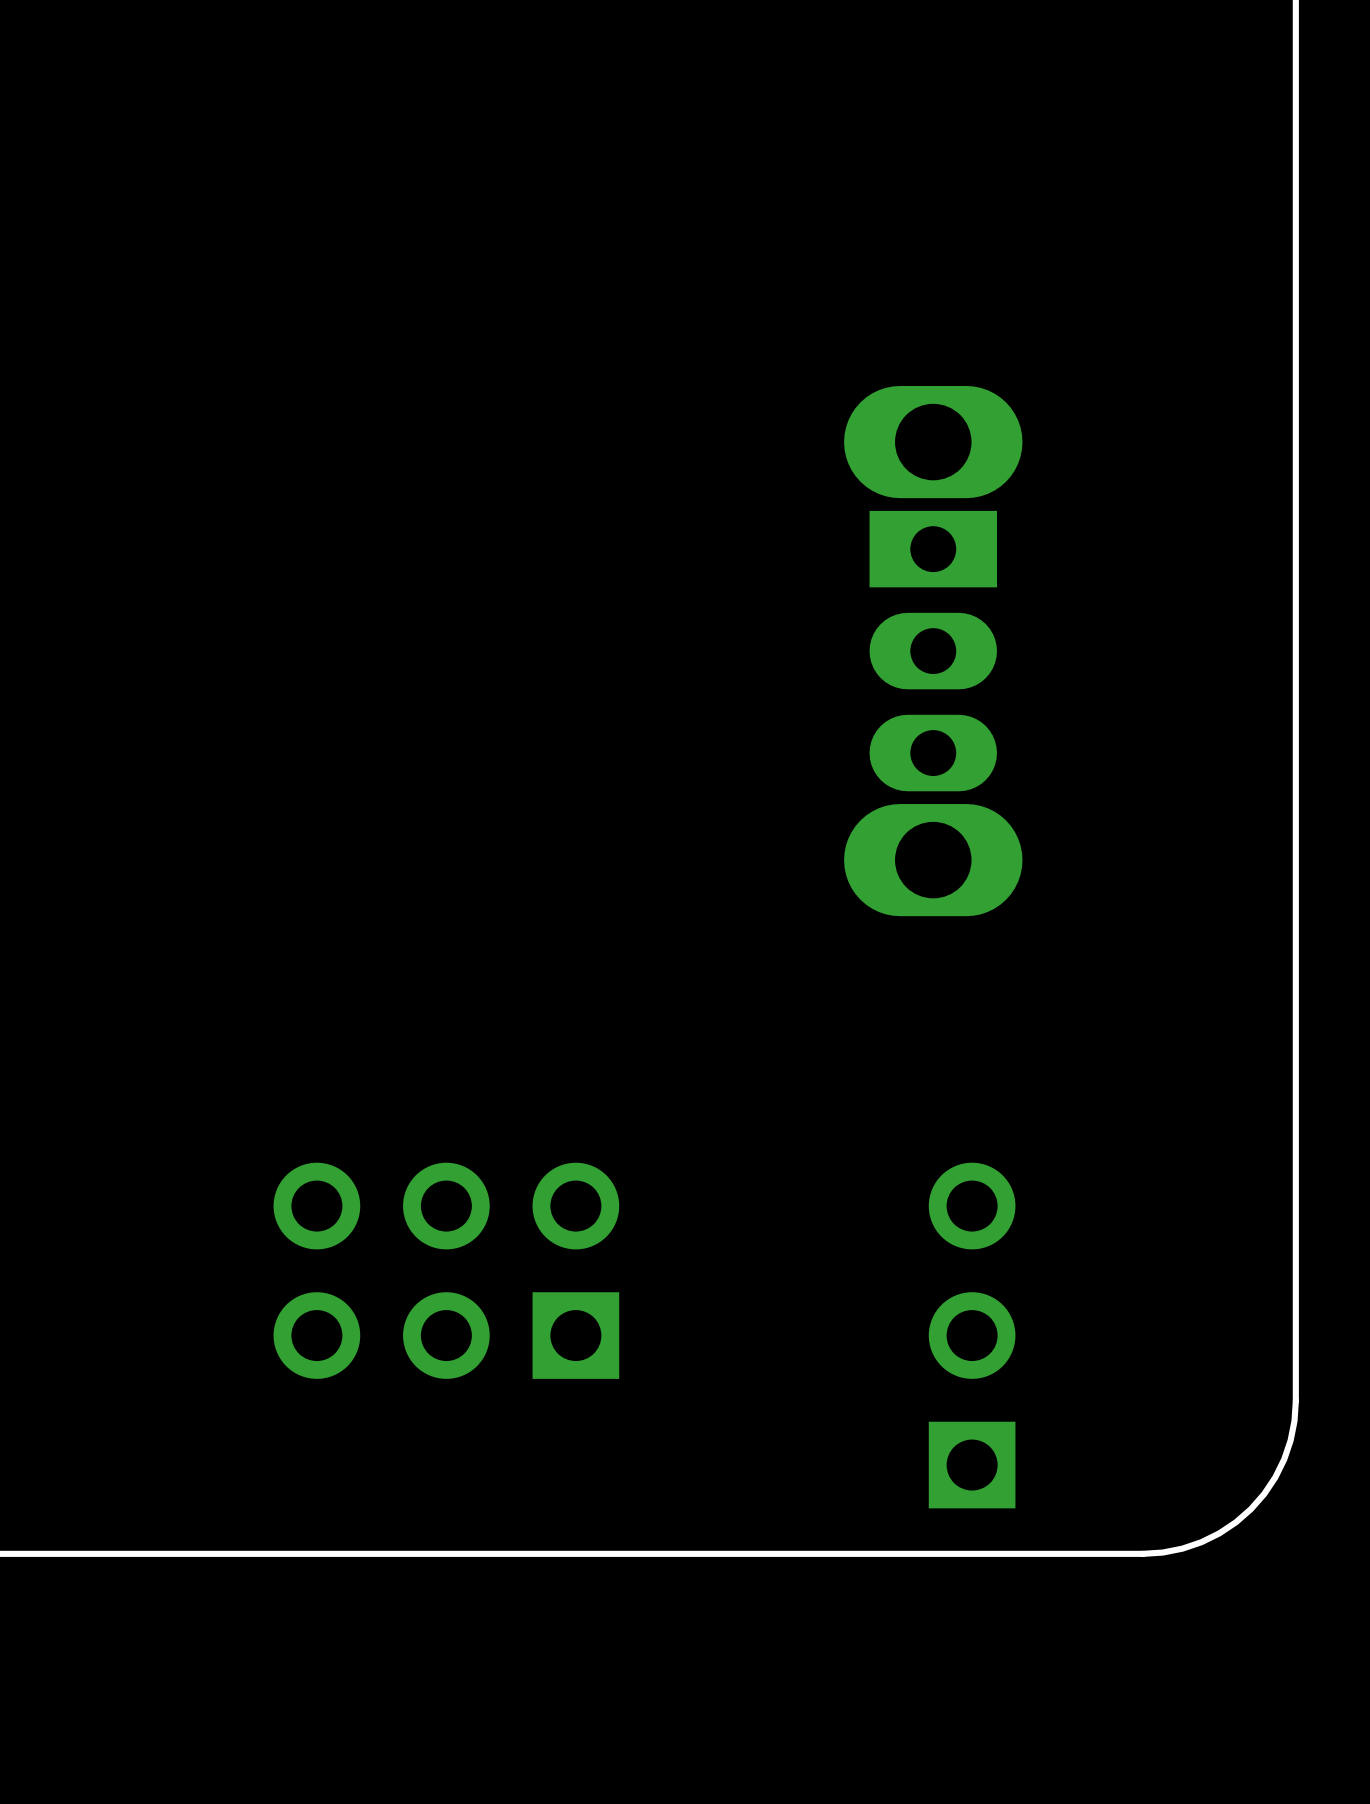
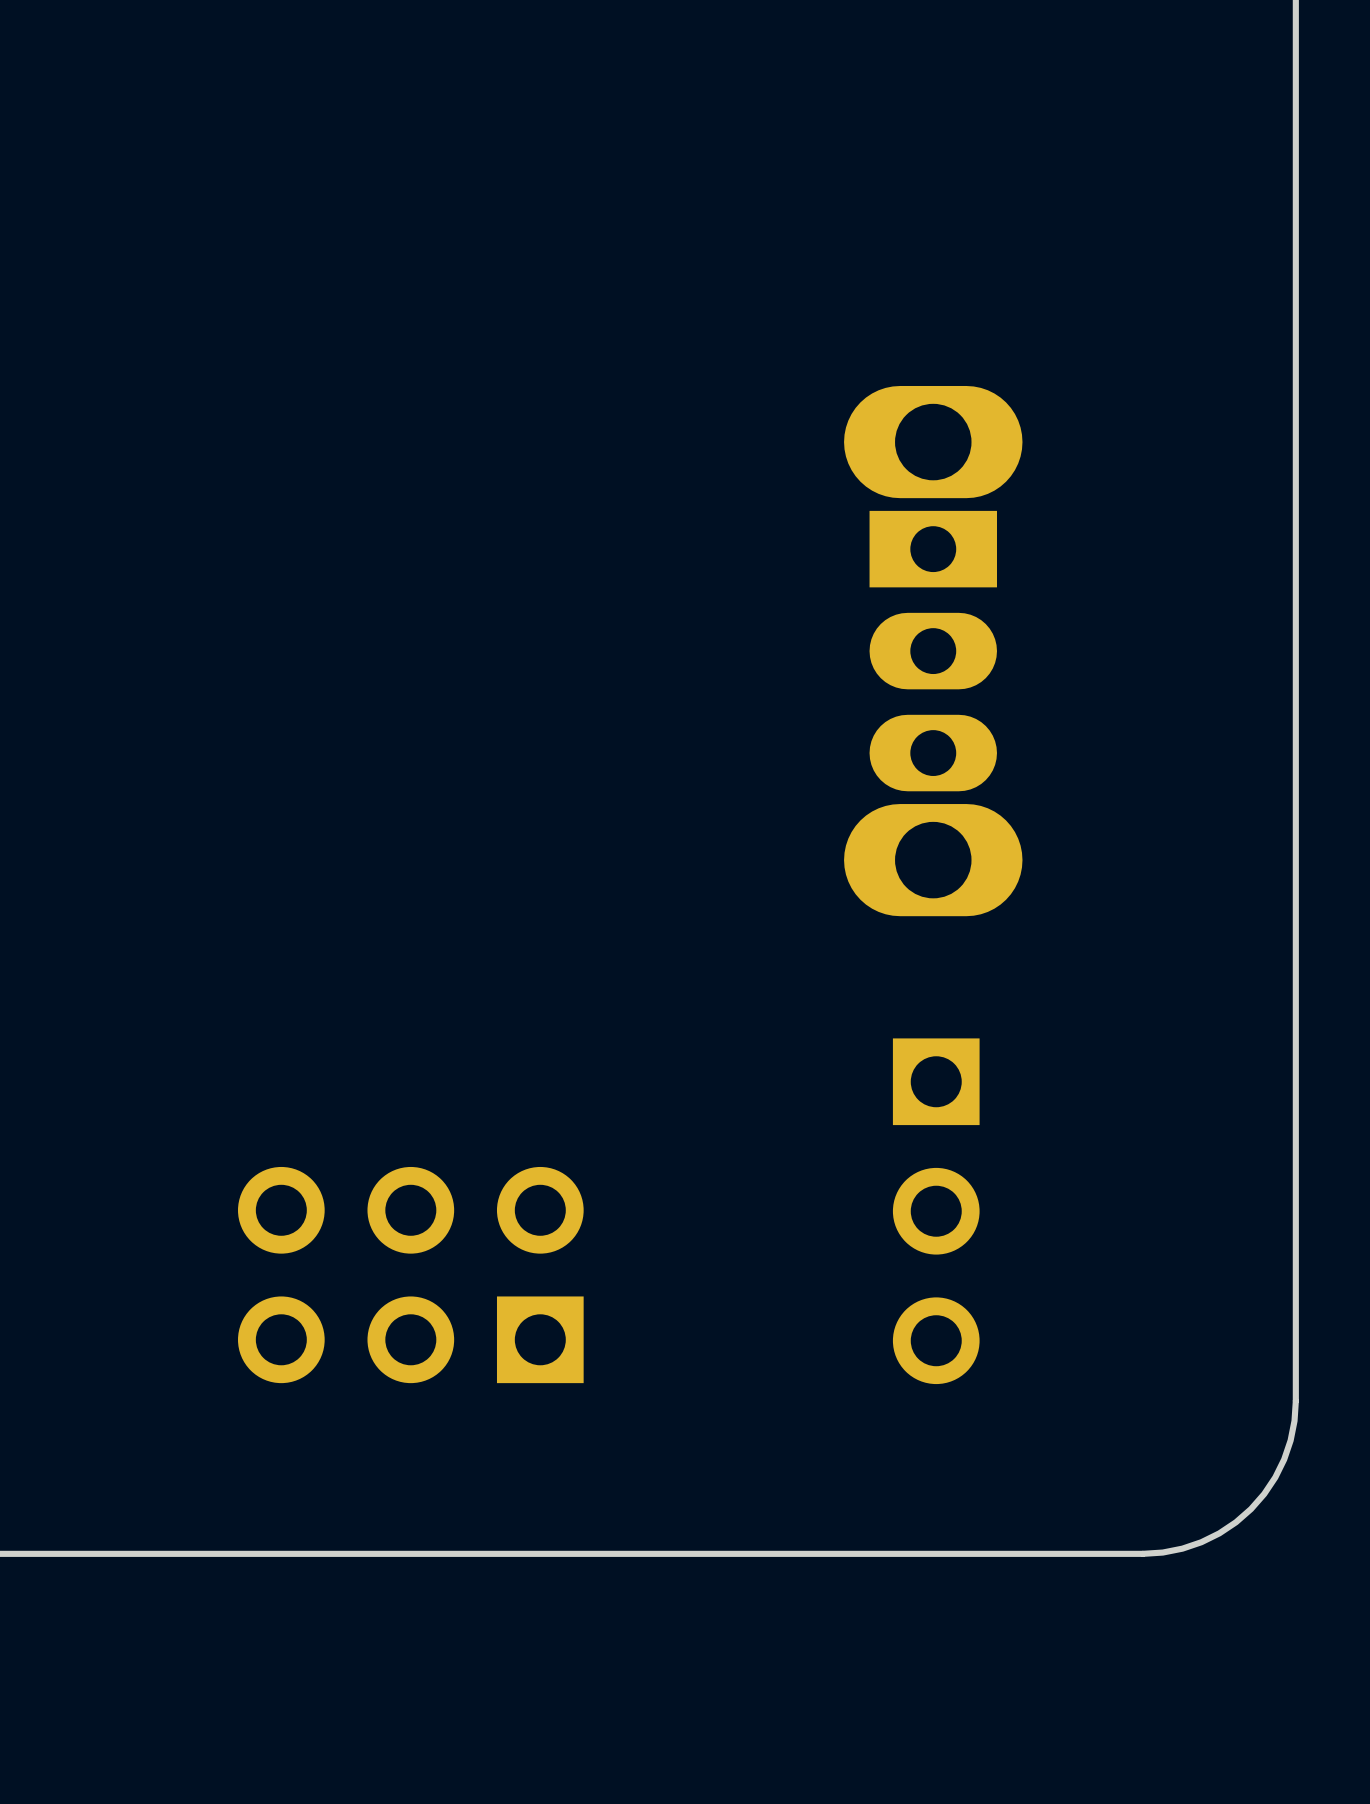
part position: (446, 1270) -> (410, 1275)
part rotation: 0° (972, 1335) -> 180° (936, 1211)

